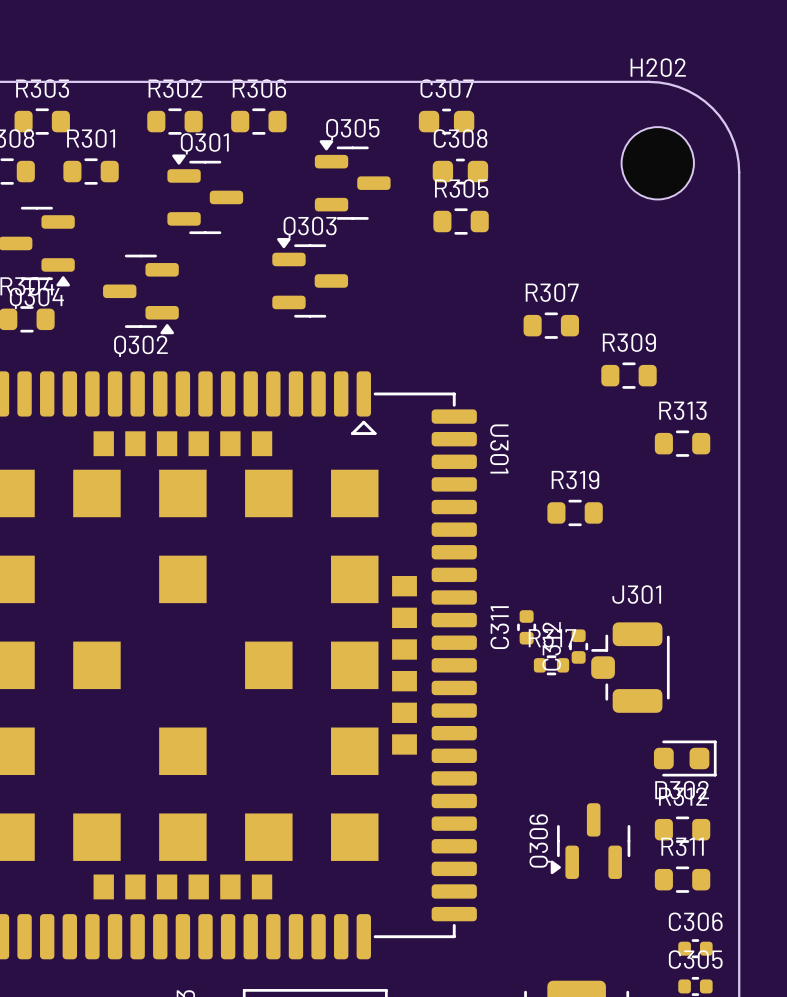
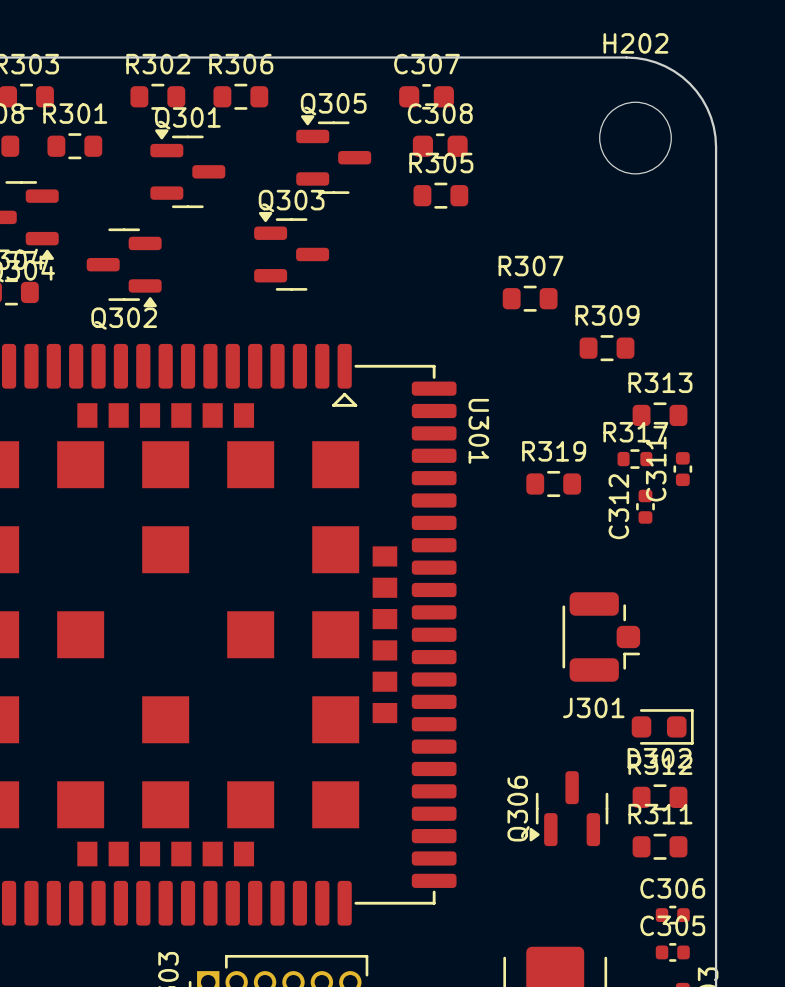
C311 position: (526, 627) -> (682, 469)
C312 position: (578, 646) -> (645, 506)
R317 position: (551, 665) -> (634, 459)
J301 rotation: 0° (630, 667) -> 180° (601, 636)

